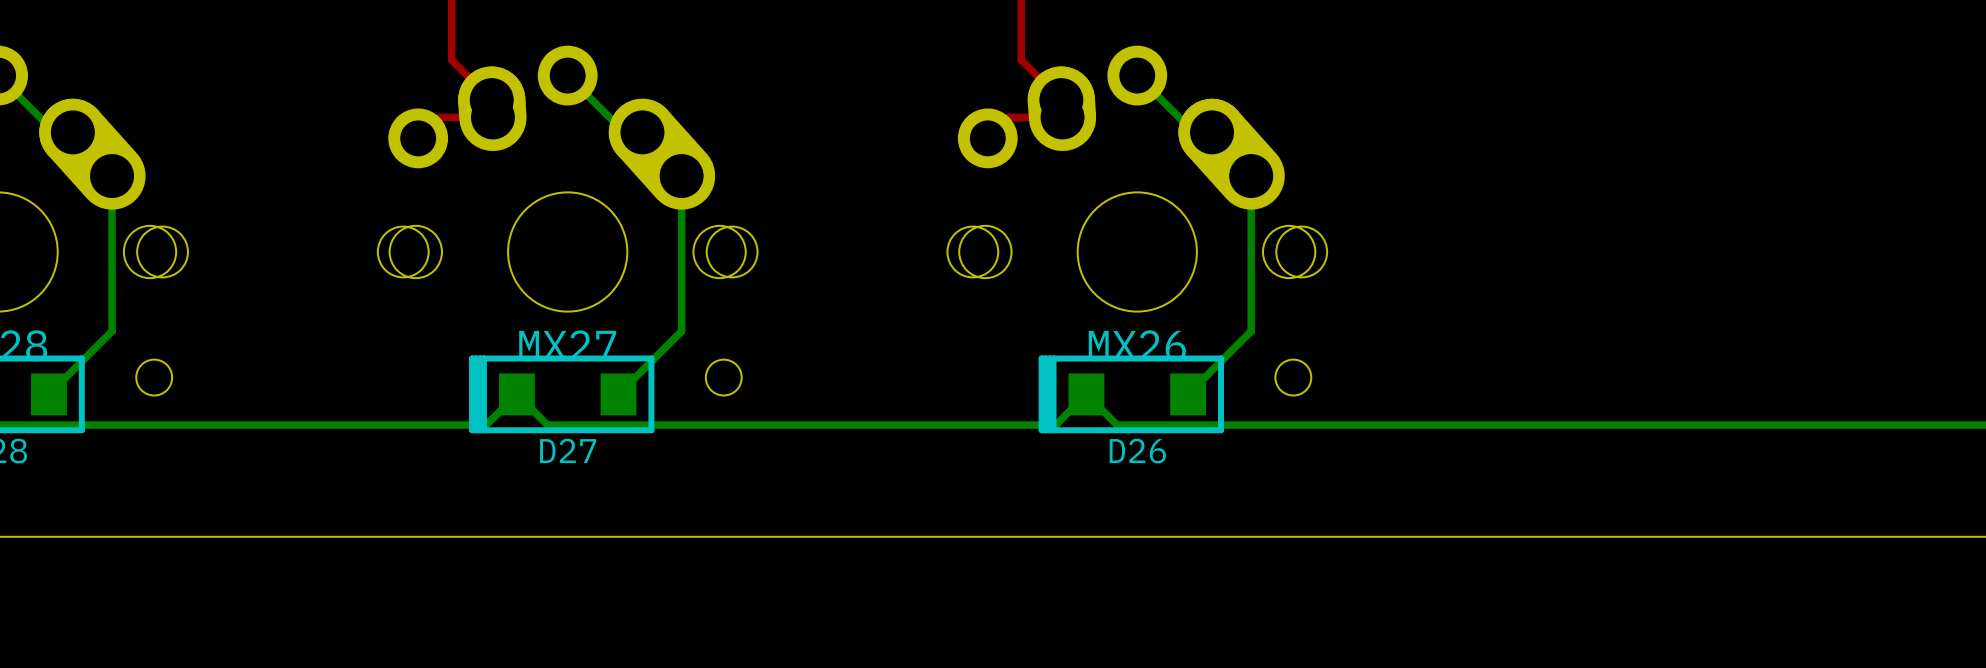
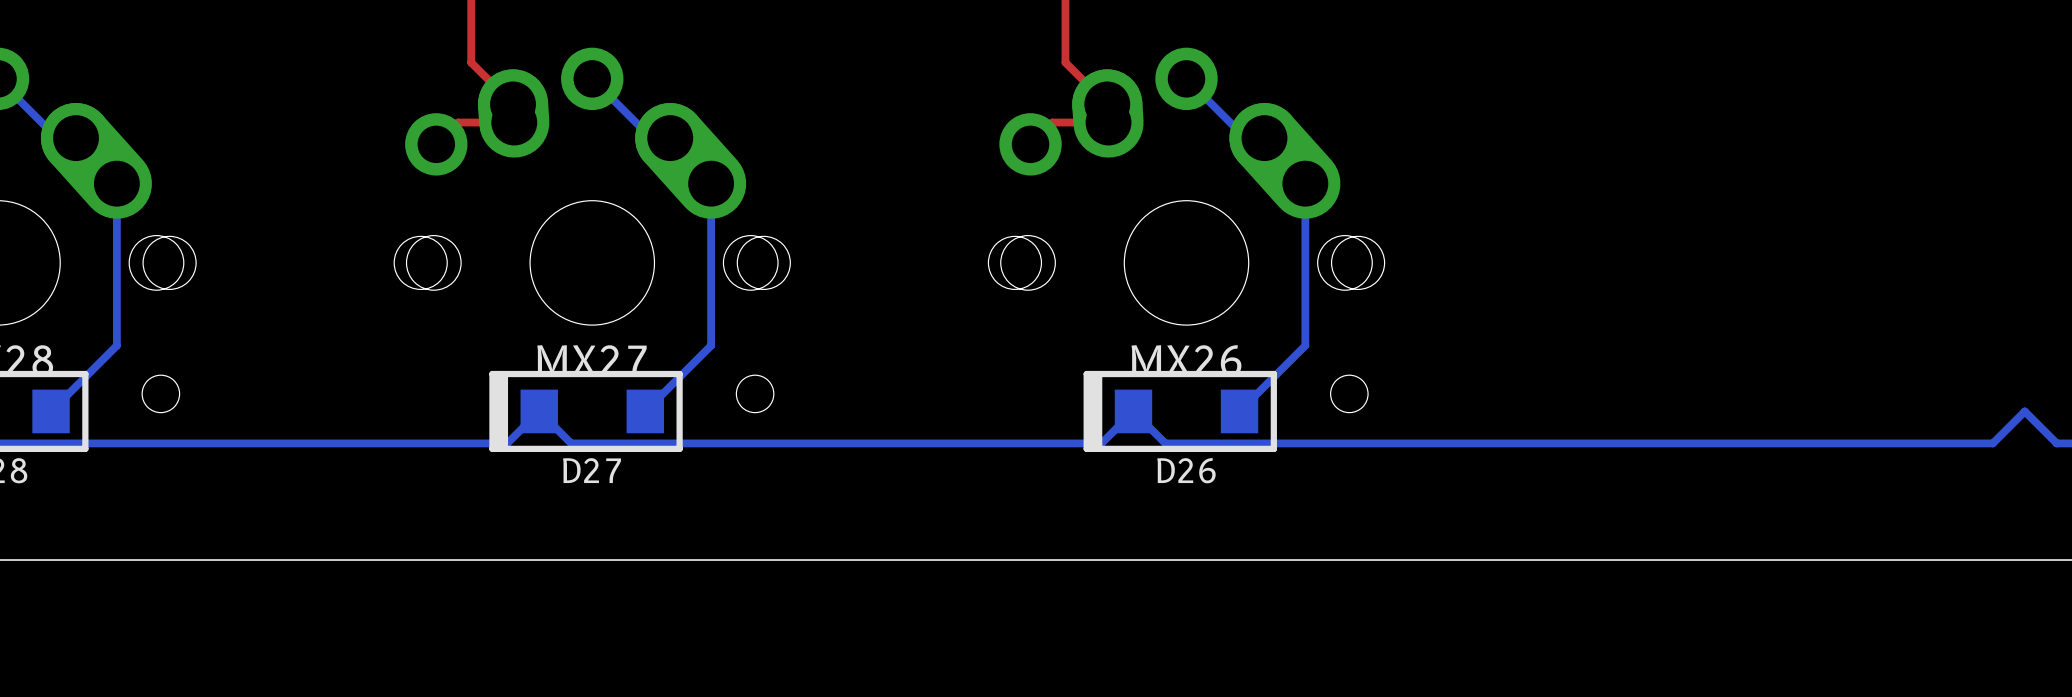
bottom track: (1971, 425) (1910, 425) -> (2056, 443) (2024, 411) (1992, 443)

